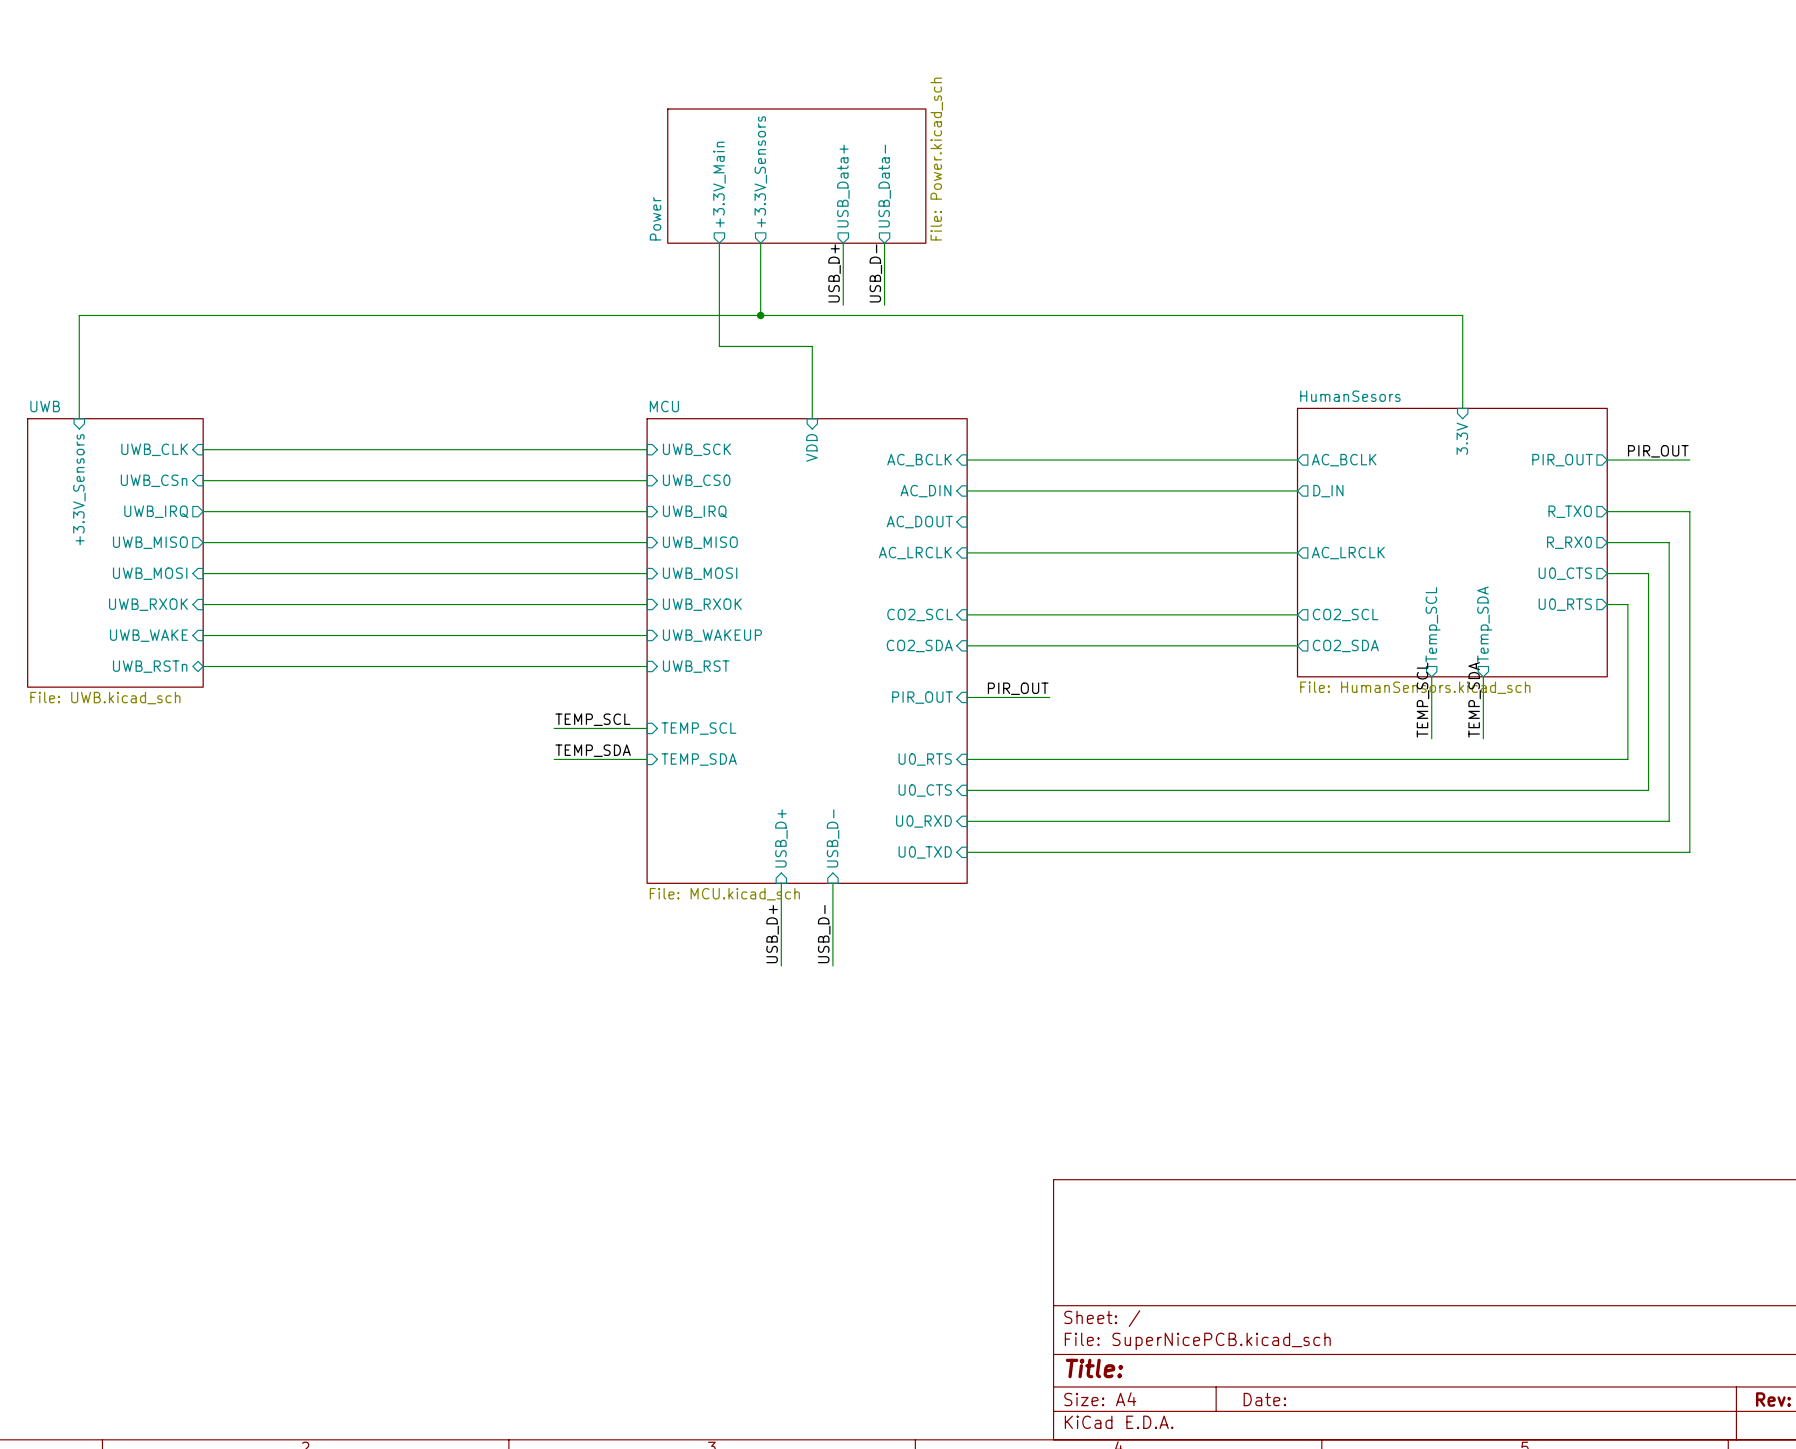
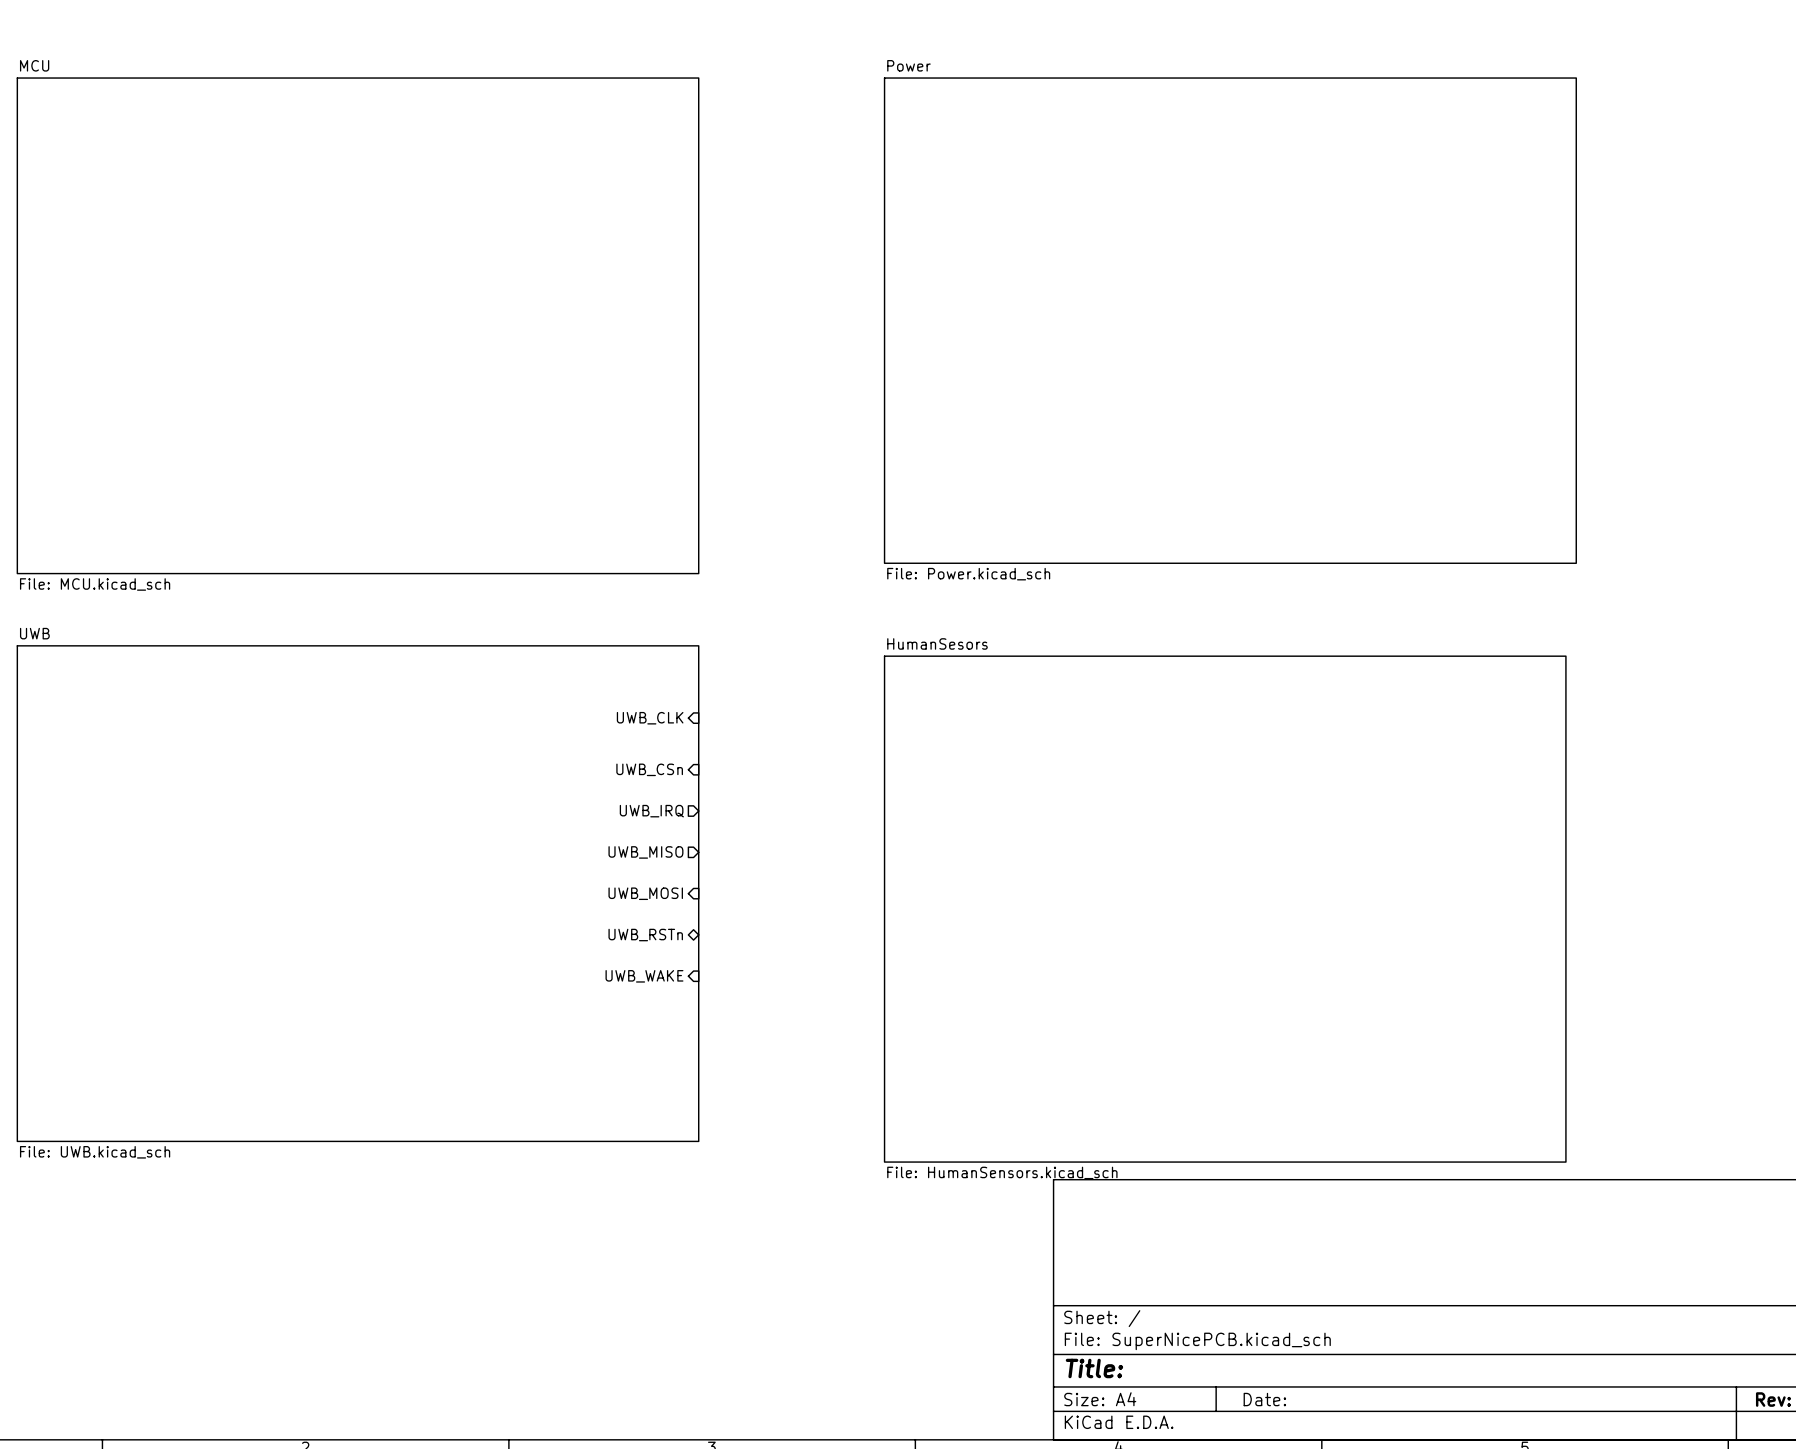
sheet pin: +3.3V_Sensors (760, 171) -> none
sheet Power: File: Power.kicad_sch (796, 176) -> none
sheet pin: +3.3V_Main (719, 184) -> none
sheet pin: USB_Data+ (843, 186) -> none
sheet pin: USB_Data- (884, 186) -> none
wire: (719, 243) (719, 346) (812, 346) (812, 418) -> none
wire: (760, 243) (760, 315) -> none
wire: (843, 243) (843, 305) -> none
label: USB_D+ (834, 273) -> none
label: USB_D- (875, 273) -> none
junction: (760, 315) -> none
sheet Power: none -> File: Power.kicad_sch (1230, 320)
sheet MCU: none -> File: MCU.kicad_sch (358, 325)
wire: (1462, 408) (1462, 315) (79, 315) (79, 418) -> none
sheet pin: 3.3V (1462, 438) -> none
sheet pin: VDD (811, 447) -> none
sheet pin: UWB_CLK (154, 449) -> none
wire: (203, 449) (647, 449) -> none
sheet pin: UWB_SCK (696, 449) -> none
label: PIR_OUT (1658, 451) -> none
sheet pin: AC_BCLK (919, 460) -> none
wire: (967, 460) (1297, 460) -> none
sheet pin: AC_BCLK (1344, 460) -> none
sheet pin: PIR_OUT (1562, 460) -> none
wire: (1607, 460) (1689, 460) -> none
sheet pin: UWB_CSn (154, 480) -> none
wire: (203, 480) (647, 480) -> none
sheet pin: UWB_CS0 (696, 480) -> none
sheet pin: +3.3V_Sensors (79, 489) -> none
wire: (967, 490) (1297, 490) -> none
sheet pin: AC_DIN (925, 491) -> none
sheet pin: D_IN (1328, 491) -> none
sheet pin: UWB_IRQ (156, 511) -> none
wire: (203, 511) (647, 511) -> none
sheet pin: UWB_IRQ (694, 511) -> none
sheet pin: R_TXO (1570, 511) -> none
wire: (1607, 511) (1689, 511) (1689, 852) (967, 852) -> none
sheet pin: AC_DOUT (919, 522) -> none
sheet pin: UWB_MISO (150, 542) -> none
wire: (203, 542) (647, 542) -> none
sheet pin: UWB_MISO (700, 542) -> none
sheet HumanSesors: File: HumanSensors.kicad_sch (1452, 542) -> none
sheet pin: R_RX0 (1569, 542) -> none
wire: (1607, 542) (1669, 542) (1669, 821) (967, 821) -> none
sheet UWB: File: UWB.kicad_sch (115, 552) -> none
wire: (967, 552) (1297, 552) -> none
sheet pin: AC_LRCLK (915, 553) -> none
sheet pin: AC_LRCLK (1348, 553) -> none
sheet pin: UWB_MOSI (150, 573) -> none
sheet pin: UWB_MOSI (700, 573) -> none
sheet pin: U0_CTS (1565, 573) -> none
wire: (1607, 573) (1648, 573) (1648, 790) (967, 790) -> none
sheet pin: UWB_RXOK (148, 604) -> none
wire: (203, 604) (647, 604) -> none
sheet pin: UWB_RXOK (702, 604) -> none
sheet pin: U0_RTS (1565, 604) -> none
wire: (1607, 604) (1627, 604) (1627, 759) (967, 759) -> none
sheet pin: CO2_SCL (920, 614) -> none
wire: (967, 614) (1297, 614) -> none
sheet pin: CO2_SCL (1345, 614) -> none
sheet pin: Temp_SCL (1433, 624) -> none
sheet pin: Temp_SDA (1484, 624) -> none
sheet pin: UWB_WAKE (148, 635) -> none
wire: (203, 635) (647, 635) -> none
sheet pin: UWB_WAKEUP (712, 635) -> none
sheet pin: CO2_SDA (919, 645) -> none
wire: (967, 645) (1297, 645) -> none
sheet pin: CO2_SDA (1345, 645) -> none
sheet MCU: File: MCU.kicad_sch (807, 651) -> none
sheet pin: UWB_RSTn (150, 666) -> none
wire: (203, 666) (647, 666) -> none
sheet pin: UWB_RST (696, 666) -> none
wire: (1431, 676) (1431, 738) -> none
wire: (1483, 676) (1483, 738) -> none
label: PIR_OUT (1018, 688) -> none
sheet pin: PIR_OUT (922, 697) -> none
wire: (967, 697) (1049, 697) -> none
label: TEMP_SDA (1474, 699) -> none
label: TEMP_SCL (1423, 700) -> none
sheet pin: none -> UWB_CLK (650, 718)
label: TEMP_SCL (592, 719) -> none
wire: (554, 728) (647, 728) -> none
sheet pin: TEMP_SCL (698, 728) -> none
label: TEMP_SDA (593, 750) -> none
wire: (554, 759) (647, 759) -> none
sheet pin: TEMP_SDA (699, 759) -> none
sheet pin: U0_RTS (925, 759) -> none
sheet pin: none -> UWB_CSn (649, 769)
sheet pin: U0_CTS (925, 790) -> none
sheet pin: none -> UWB_IRQ (651, 811)
sheet pin: U0_RXD (923, 821) -> none
sheet pin: USB_D+ (781, 838) -> none
sheet pin: USB_D- (833, 838) -> none
sheet pin: none -> UWB_MISO (645, 852)
sheet pin: U0_TXD (925, 852) -> none
wire: (781, 883) (781, 965) -> none
wire: (832, 883) (832, 965) -> none
sheet UWB: none -> File: UWB.kicad_sch (358, 893)
sheet pin: none -> UWB_MOSI (645, 893)
sheet HumanSesors: none -> File: HumanSensors.kicad_sch (1225, 909)
label: USB_D+ (772, 934) -> none
label: USB_D- (824, 934) -> none
sheet pin: none -> UWB_RSTn (645, 935)
sheet pin: none -> UWB_WAKE (644, 976)

